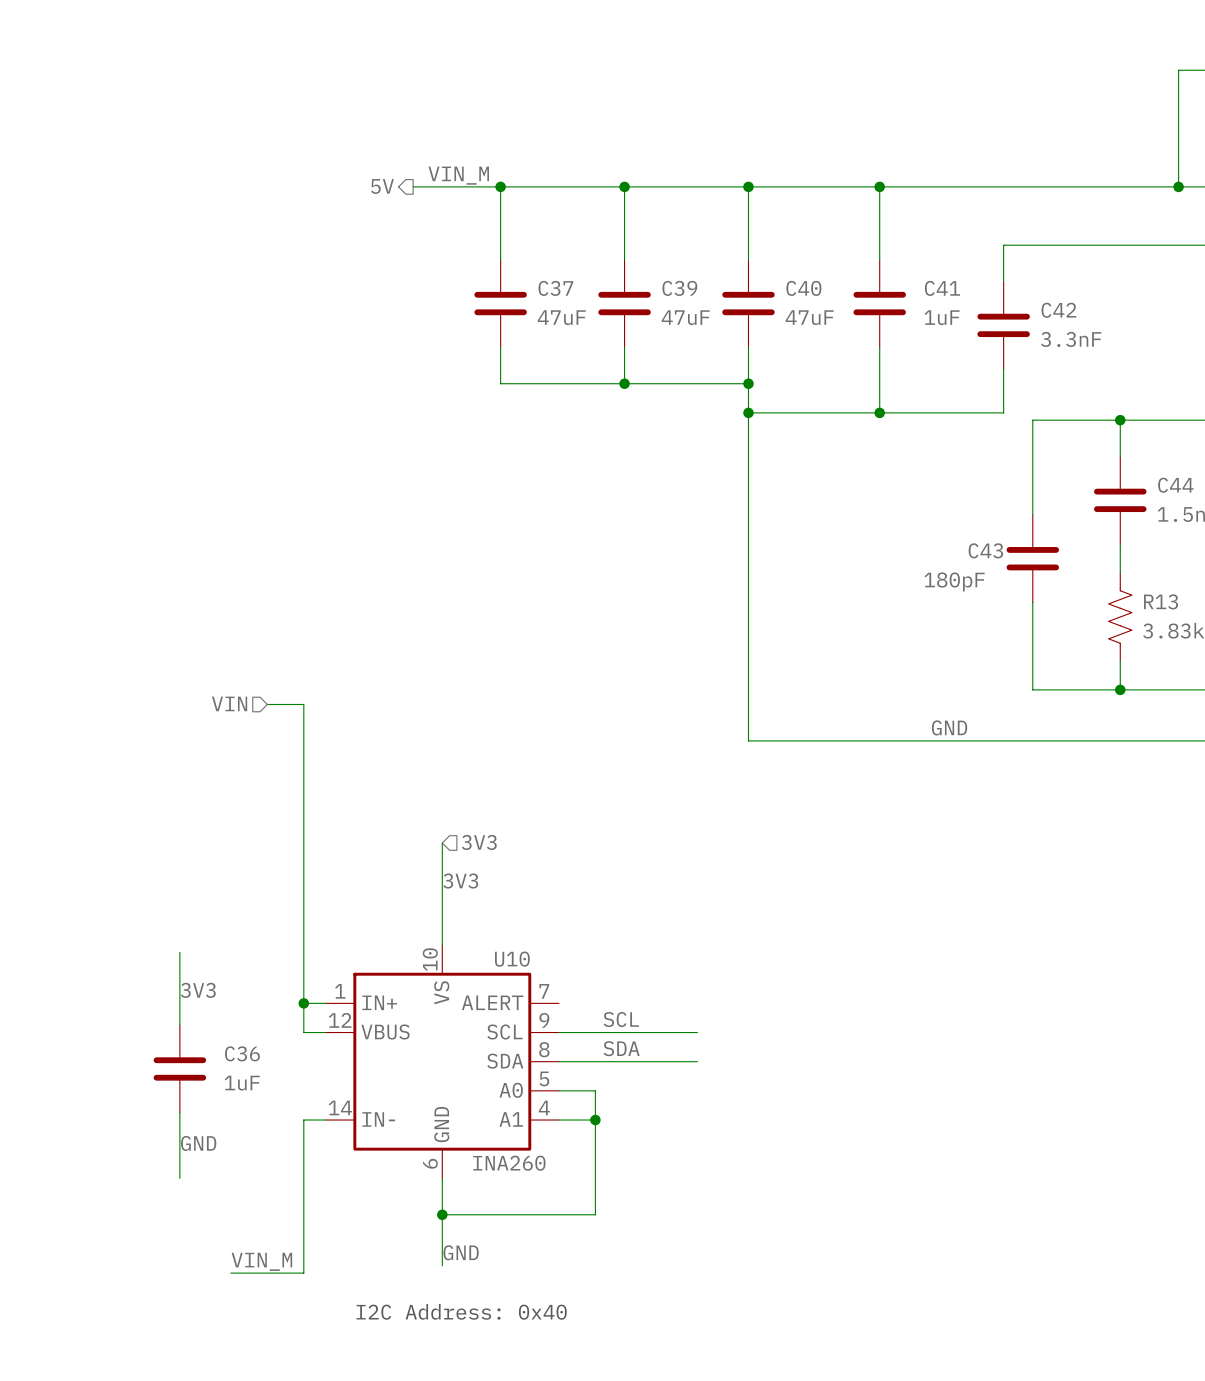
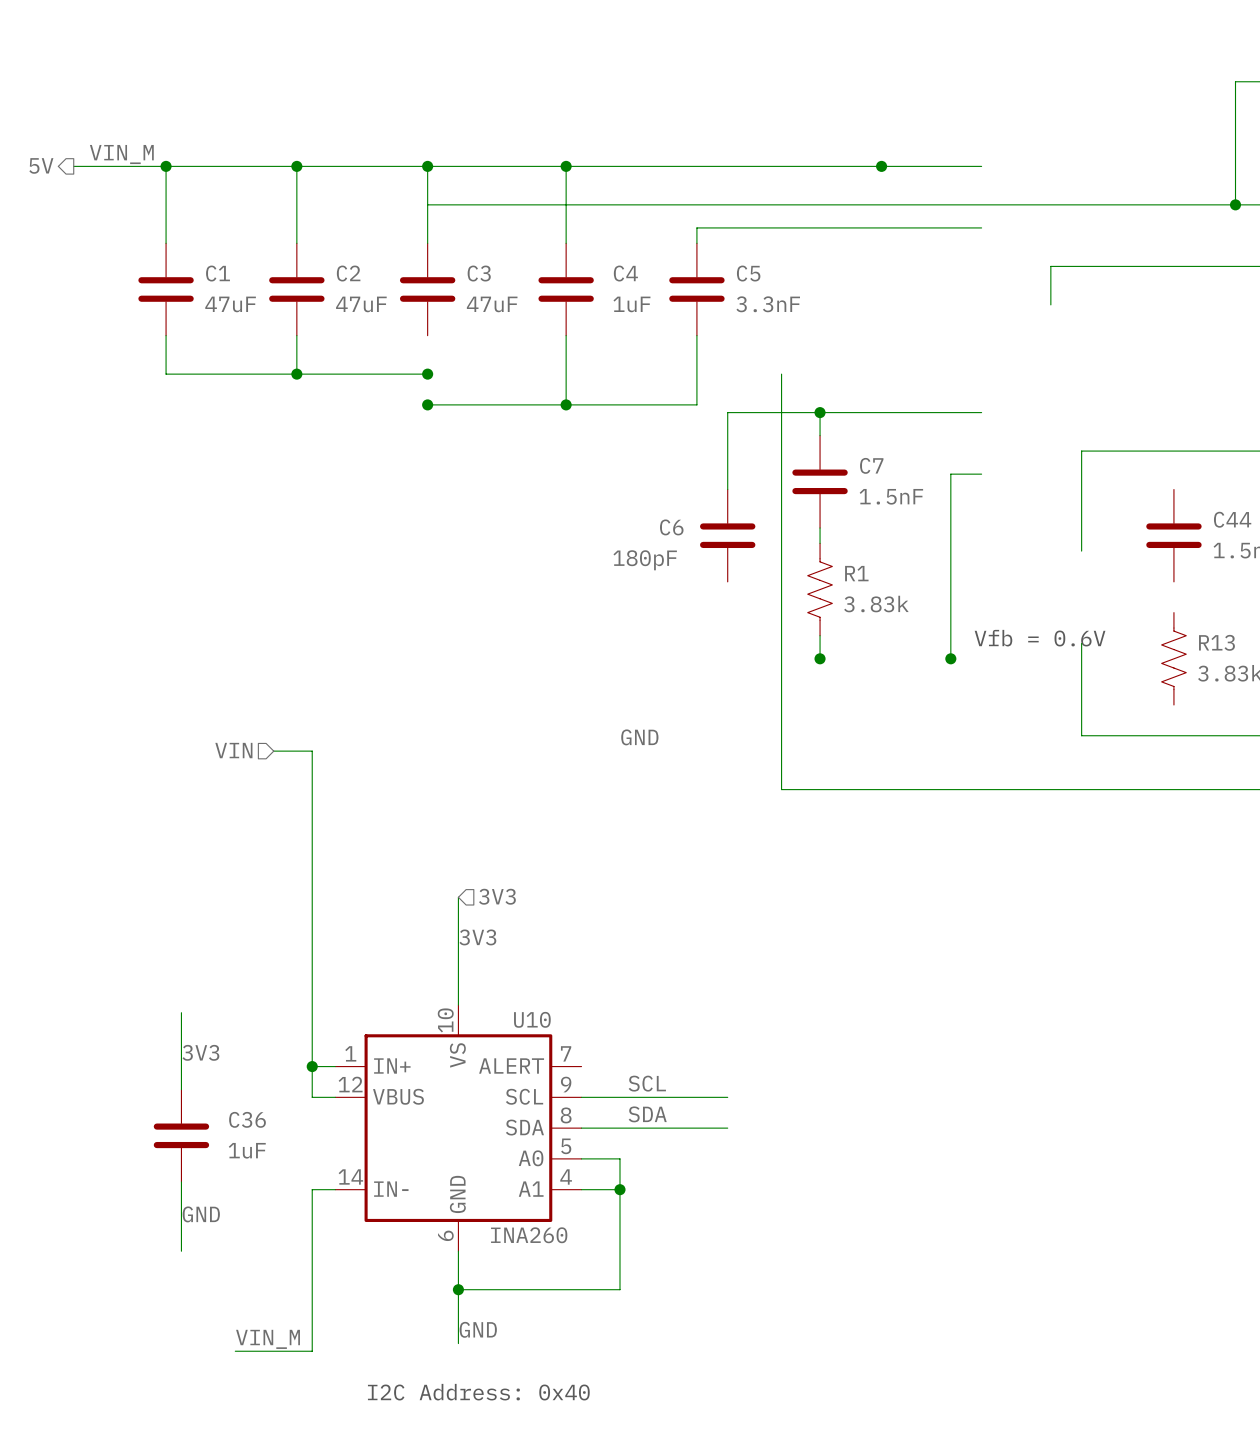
label: none -> VIN_M (121, 154)
hierarchical label: none -> 5V (41, 165)
wire: none -> (73, 166) (981, 166)
wire: none -> (166, 166) (166, 243)
junction: none -> (166, 166)
junction: none -> (296, 166)
junction: none -> (427, 166)
junction: none -> (566, 166)
junction: none -> (881, 166)
label: VIN_M (458, 175) -> none
hierarchical label: 5V (382, 186) -> none
wire: (500, 186) (500, 259) -> (296, 166) (296, 243)
junction: (500, 186) -> none
wire: (624, 186) (624, 259) -> (427, 166) (427, 243)
junction: (624, 186) -> none
wire: (748, 186) (748, 259) -> (566, 166) (566, 243)
junction: (748, 186) -> none
wire: (879, 186) (879, 259) -> none
junction: (879, 186) -> none
wire: none -> (981, 227) (696, 227) (696, 243)
C1: none -> 47uF (166, 289)
C2: none -> 47uF (296, 289)
C3: none -> 47uF (427, 289)
C4: none -> 1uF (566, 289)
C5: none -> 3.3nF (696, 289)
C37: 47uF (500, 303) -> none
C39: 47uF (624, 303) -> none
C40: 47uF (748, 303) -> none
C41: 1uF (879, 303) -> none
wire: none -> (166, 335) (166, 374) (427, 374)
wire: none -> (296, 335) (296, 374)
wire: none -> (566, 335) (566, 404)
wire: none -> (696, 335) (696, 404) (427, 404)
C42: 3.3nF (1003, 325) -> none
junction: none -> (296, 374)
junction: none -> (427, 374)
wire: (500, 347) (500, 383) (697, 383) -> (727, 489) (727, 412)
wire: (624, 347) (624, 383) -> none
wire: (879, 347) (879, 412) -> none
wire: (1003, 369) (1003, 412) (748, 412) -> none
junction: none -> (427, 404)
junction: none -> (566, 404)
junction: (624, 383) -> none
wire: none -> (781, 412) (981, 412)
junction: (748, 383) -> none
wire: none -> (820, 412) (820, 435)
junction: none -> (820, 412)
junction: (748, 412) -> none
junction: (879, 412) -> none
wire: (1120, 420) (1120, 456) -> none
junction: (1120, 420) -> none
wire: none -> (981, 474) (950, 474) (950, 658)
C7: none -> 1.5nF (820, 481)
wire: none -> (820, 528) (820, 543)
C6: none -> 180pF (727, 535)
wire: (1120, 544) (1120, 573) -> none
R1: none -> 3.83k (820, 589)
C43: 180pF (1032, 558) -> none
wire: none -> (820, 635) (820, 658)
text: none -> Vfb = 0.6V (1040, 638)
junction: none -> (820, 658)
junction: none -> (950, 658)
wire: (1120, 660) (1120, 689) -> none
junction: (1120, 689) -> none
label: none -> GND (639, 737)
label: GND (949, 727) -> none

